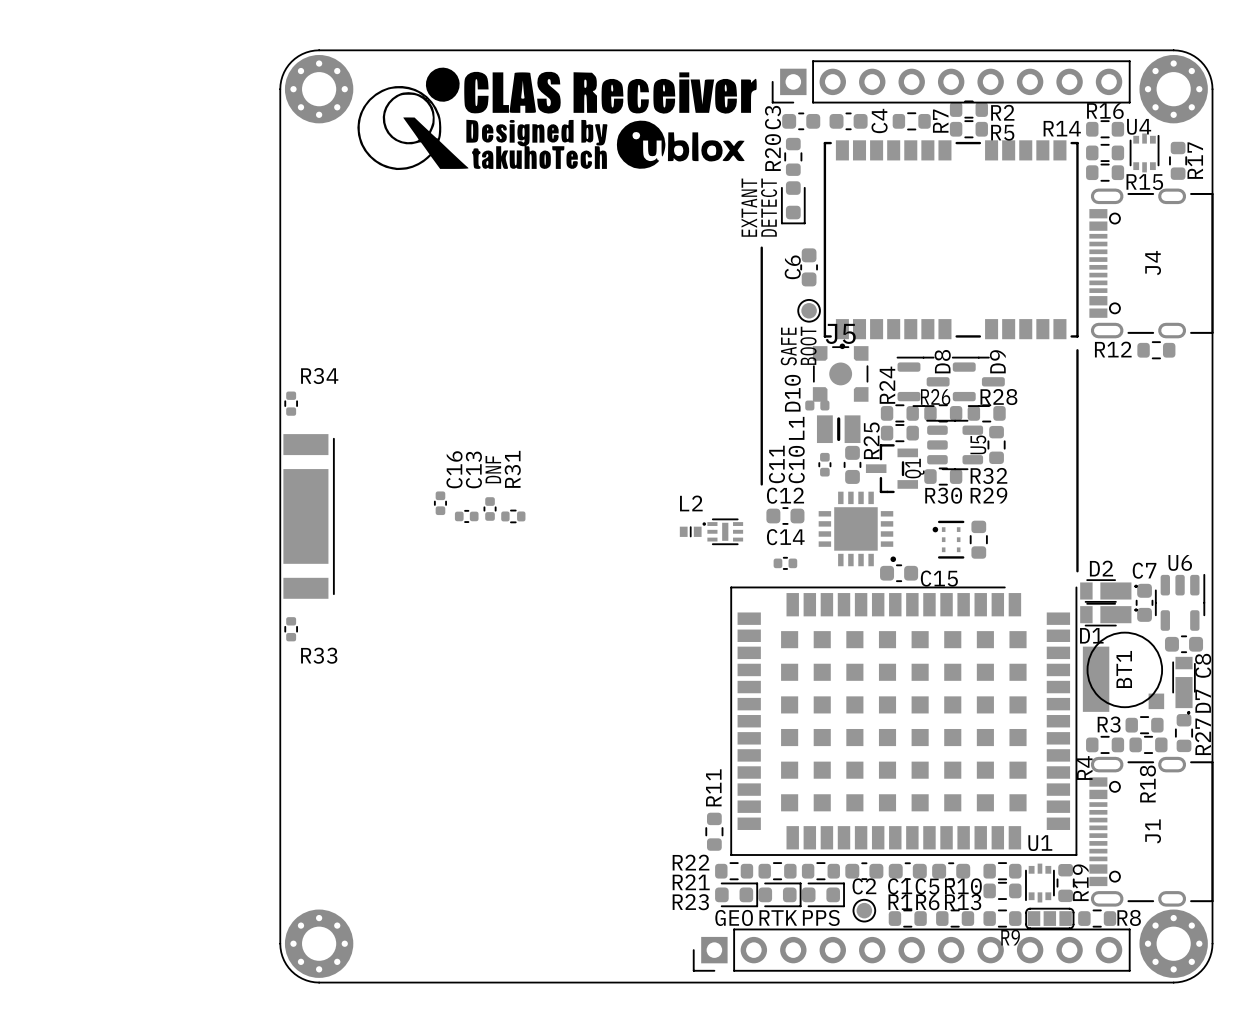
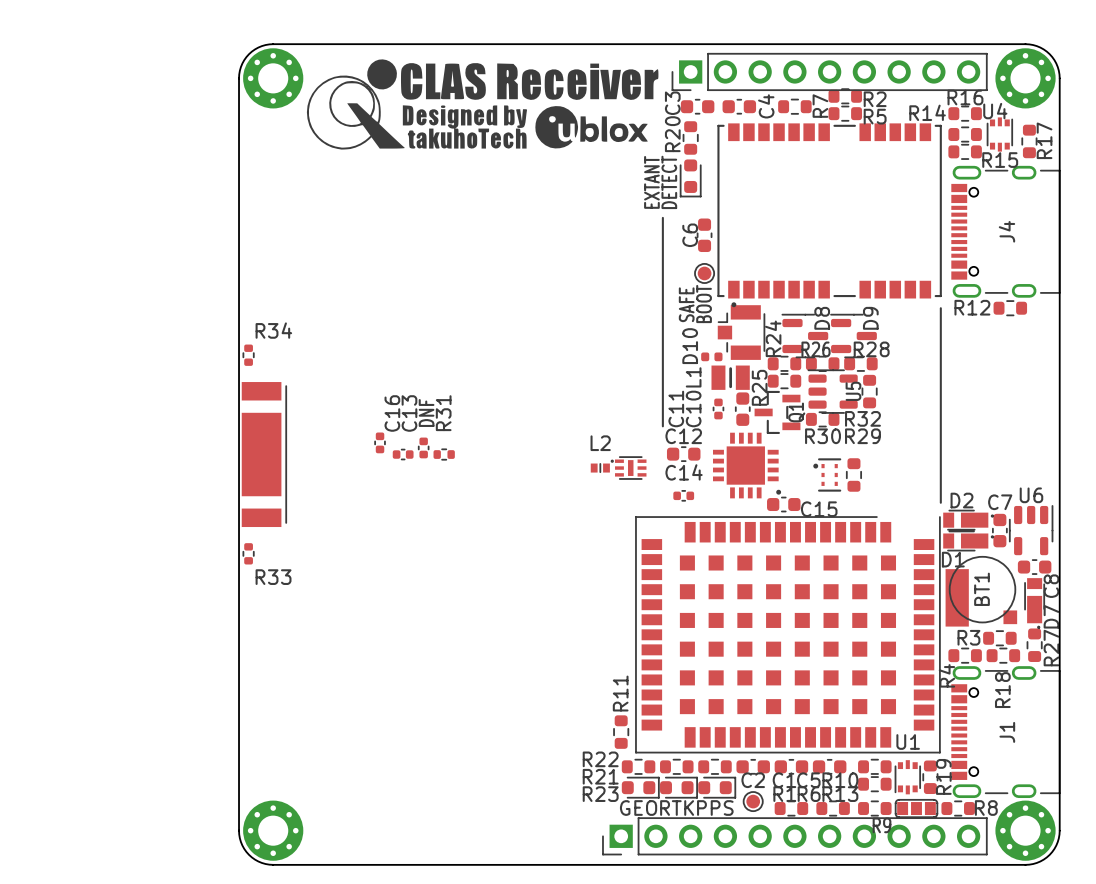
J5: (840, 373) -> none
part: none -> (741, 332)

